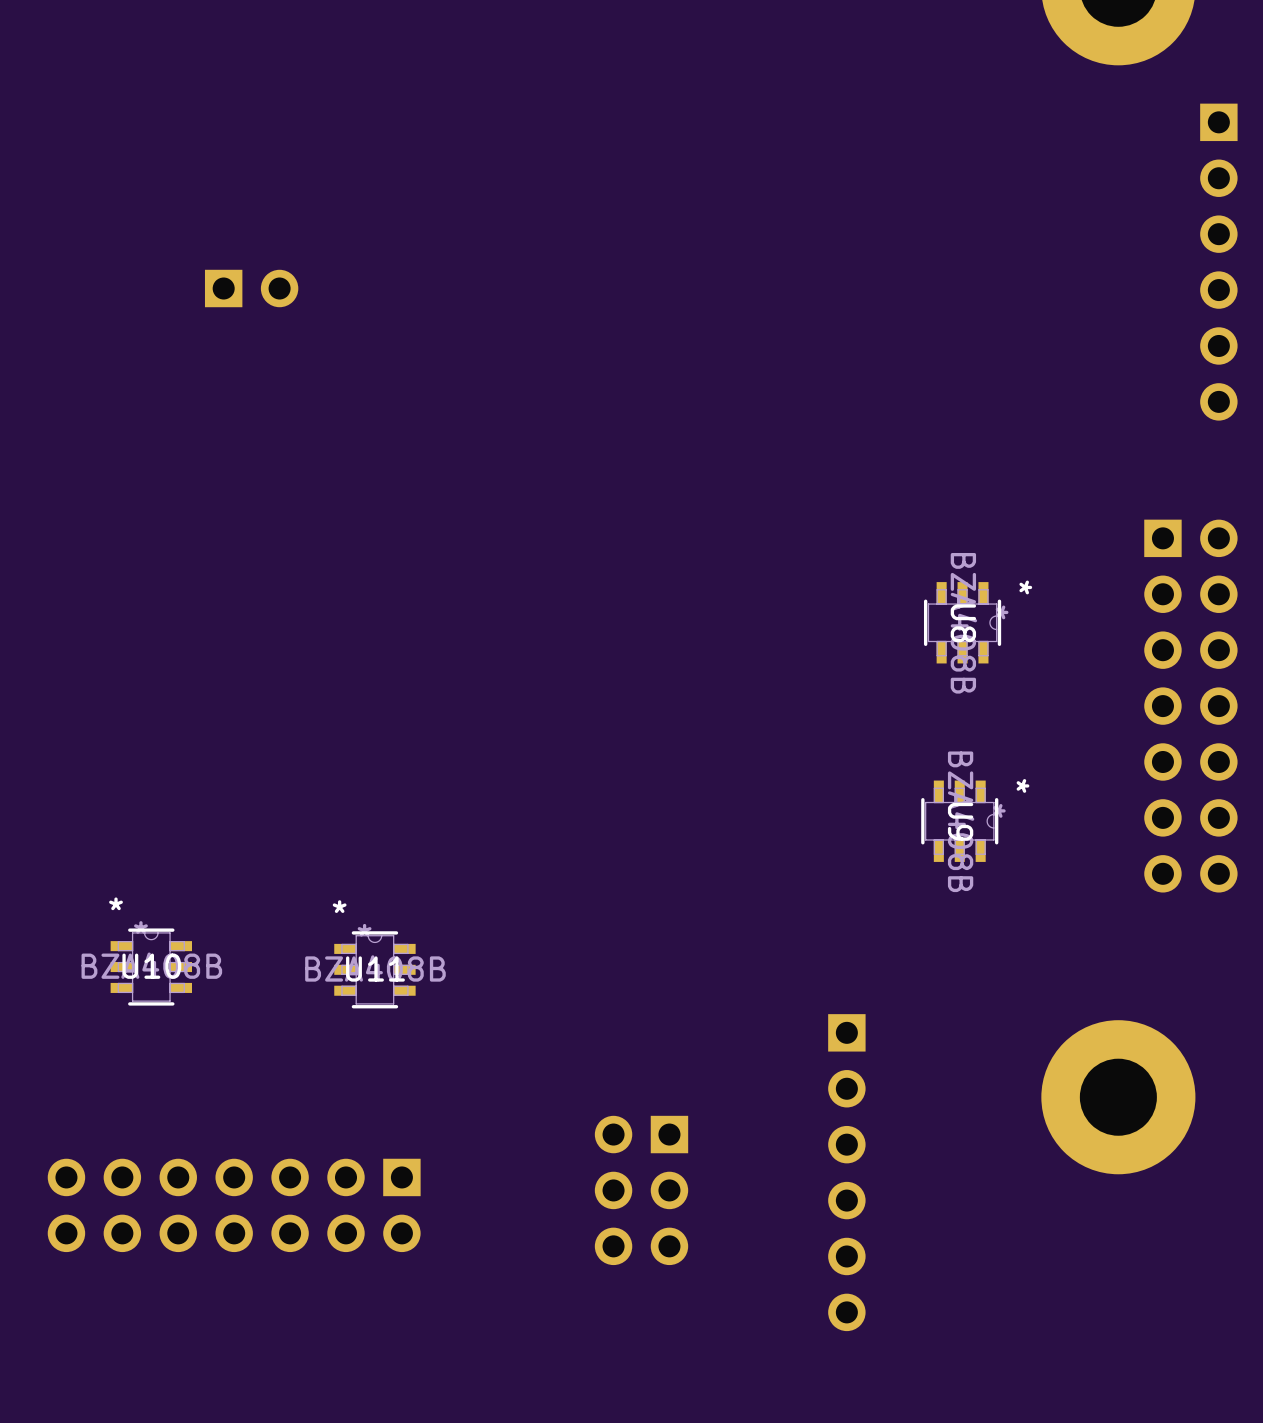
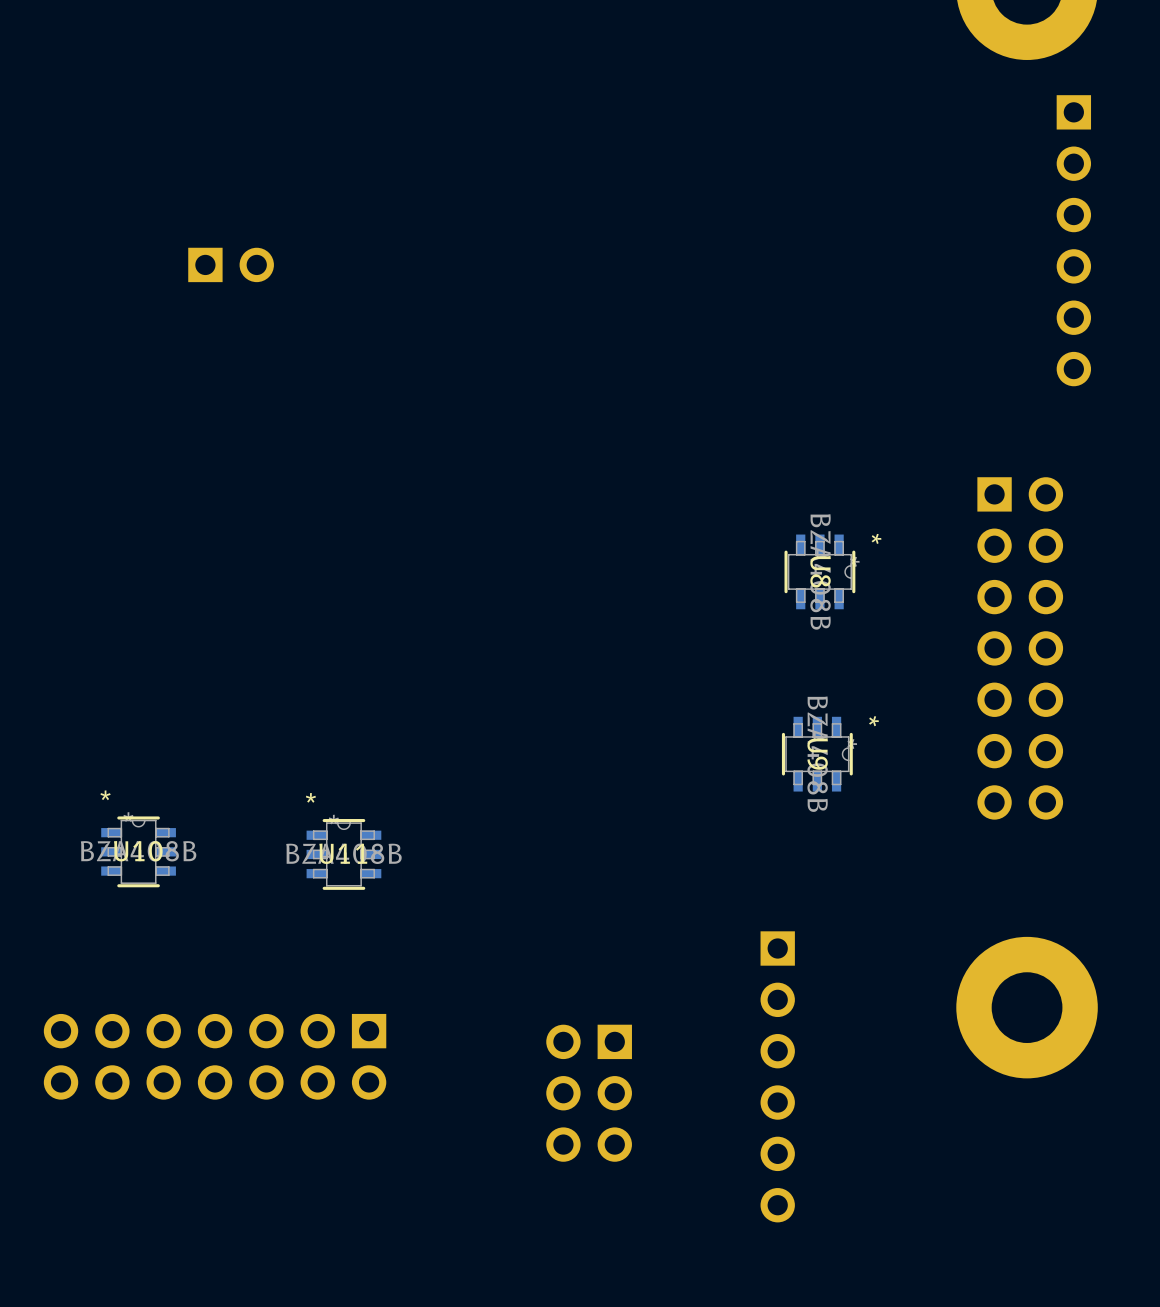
part position: (1218, 262) -> (1073, 240)
U8 position: (962, 622) -> (819, 571)
part position: (1190, 706) -> (1020, 648)
U9 position: (959, 821) -> (817, 754)
U10 position: (151, 967) -> (138, 851)
U11 position: (374, 969) -> (343, 854)
part position: (234, 1205) -> (215, 1056)

